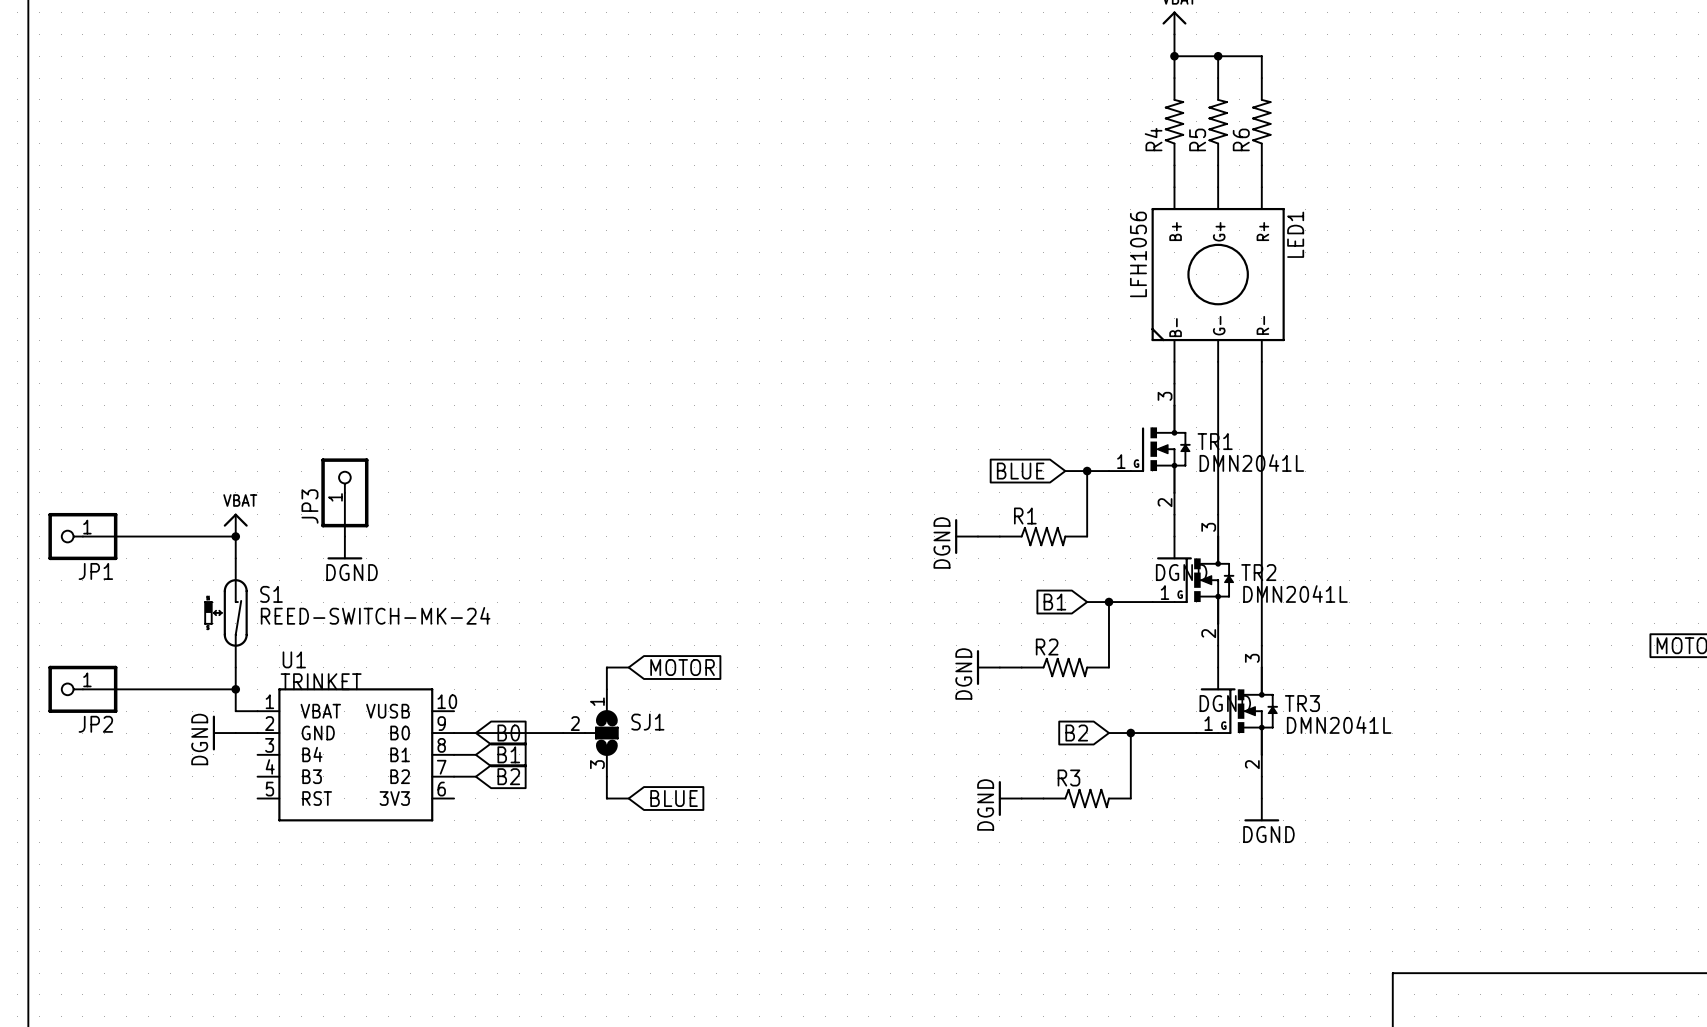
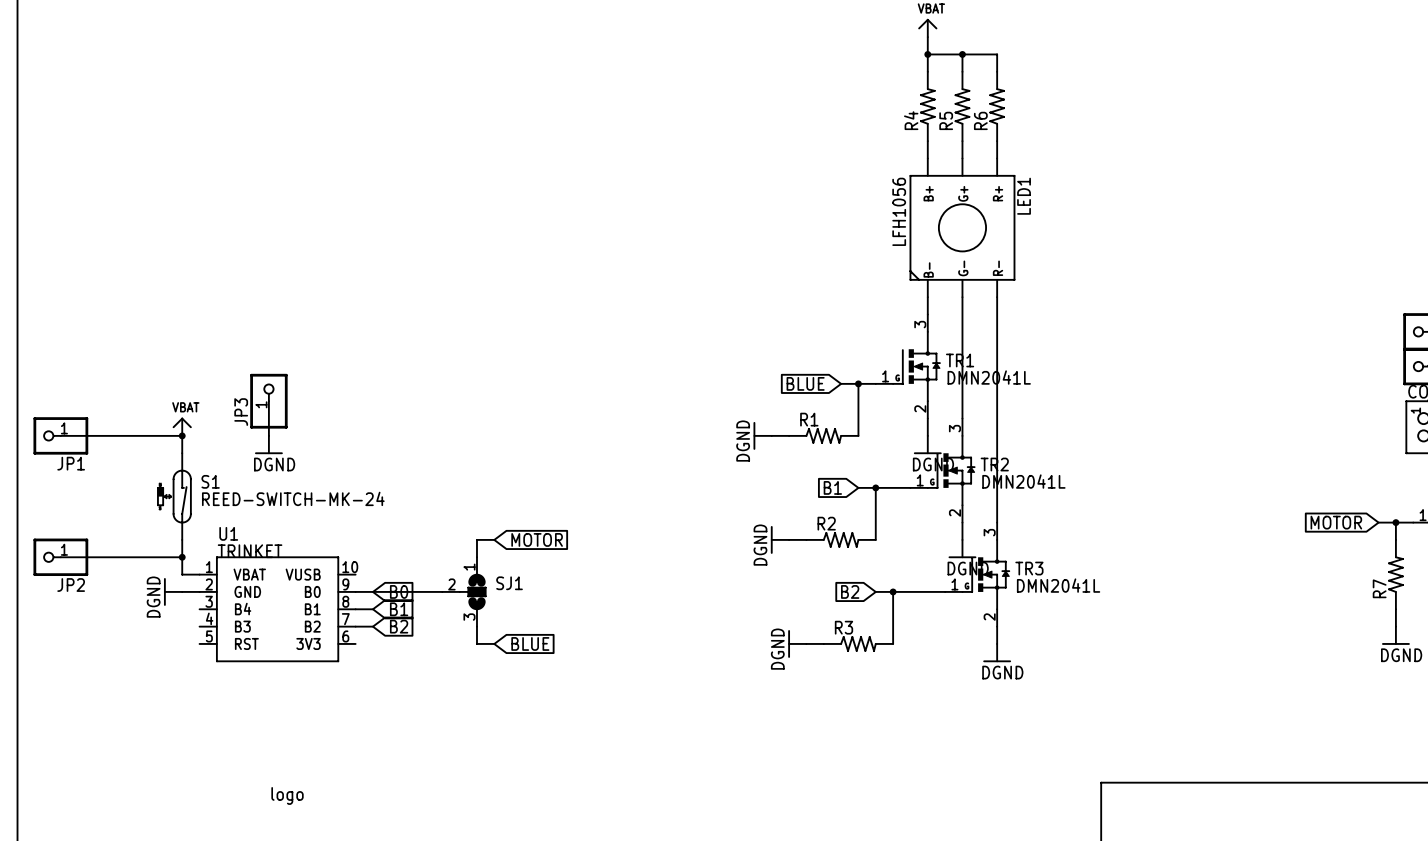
part: none -> (287, 795)

